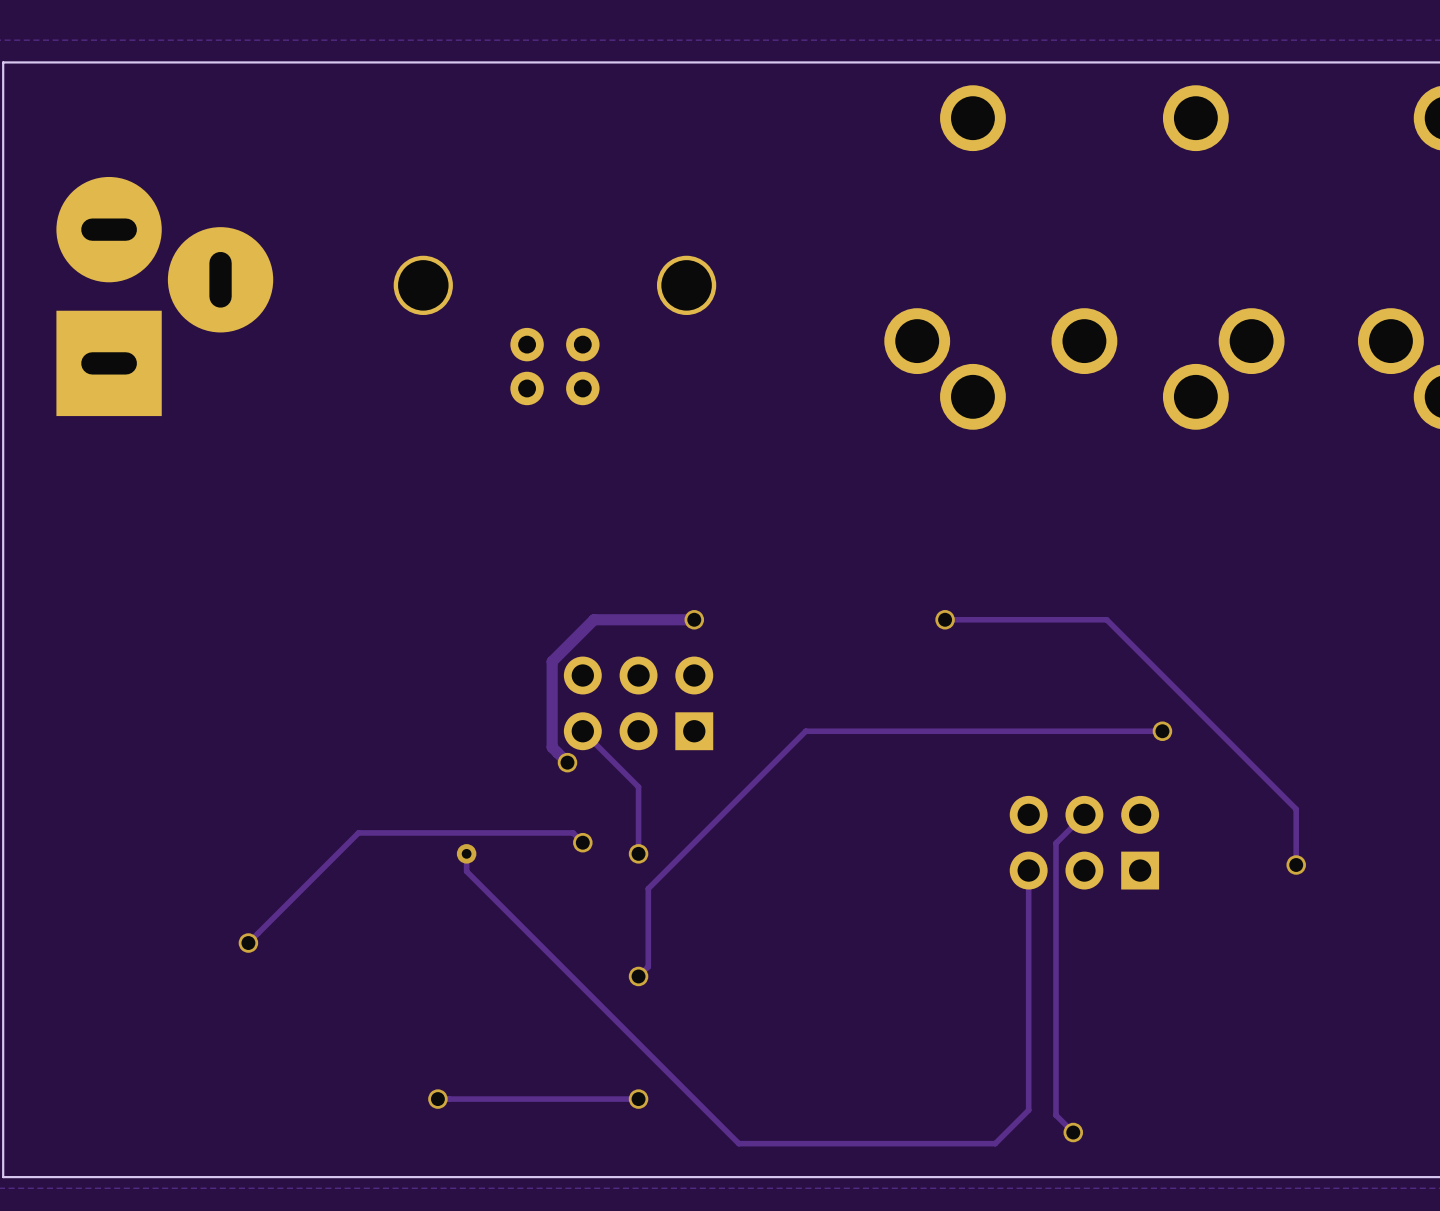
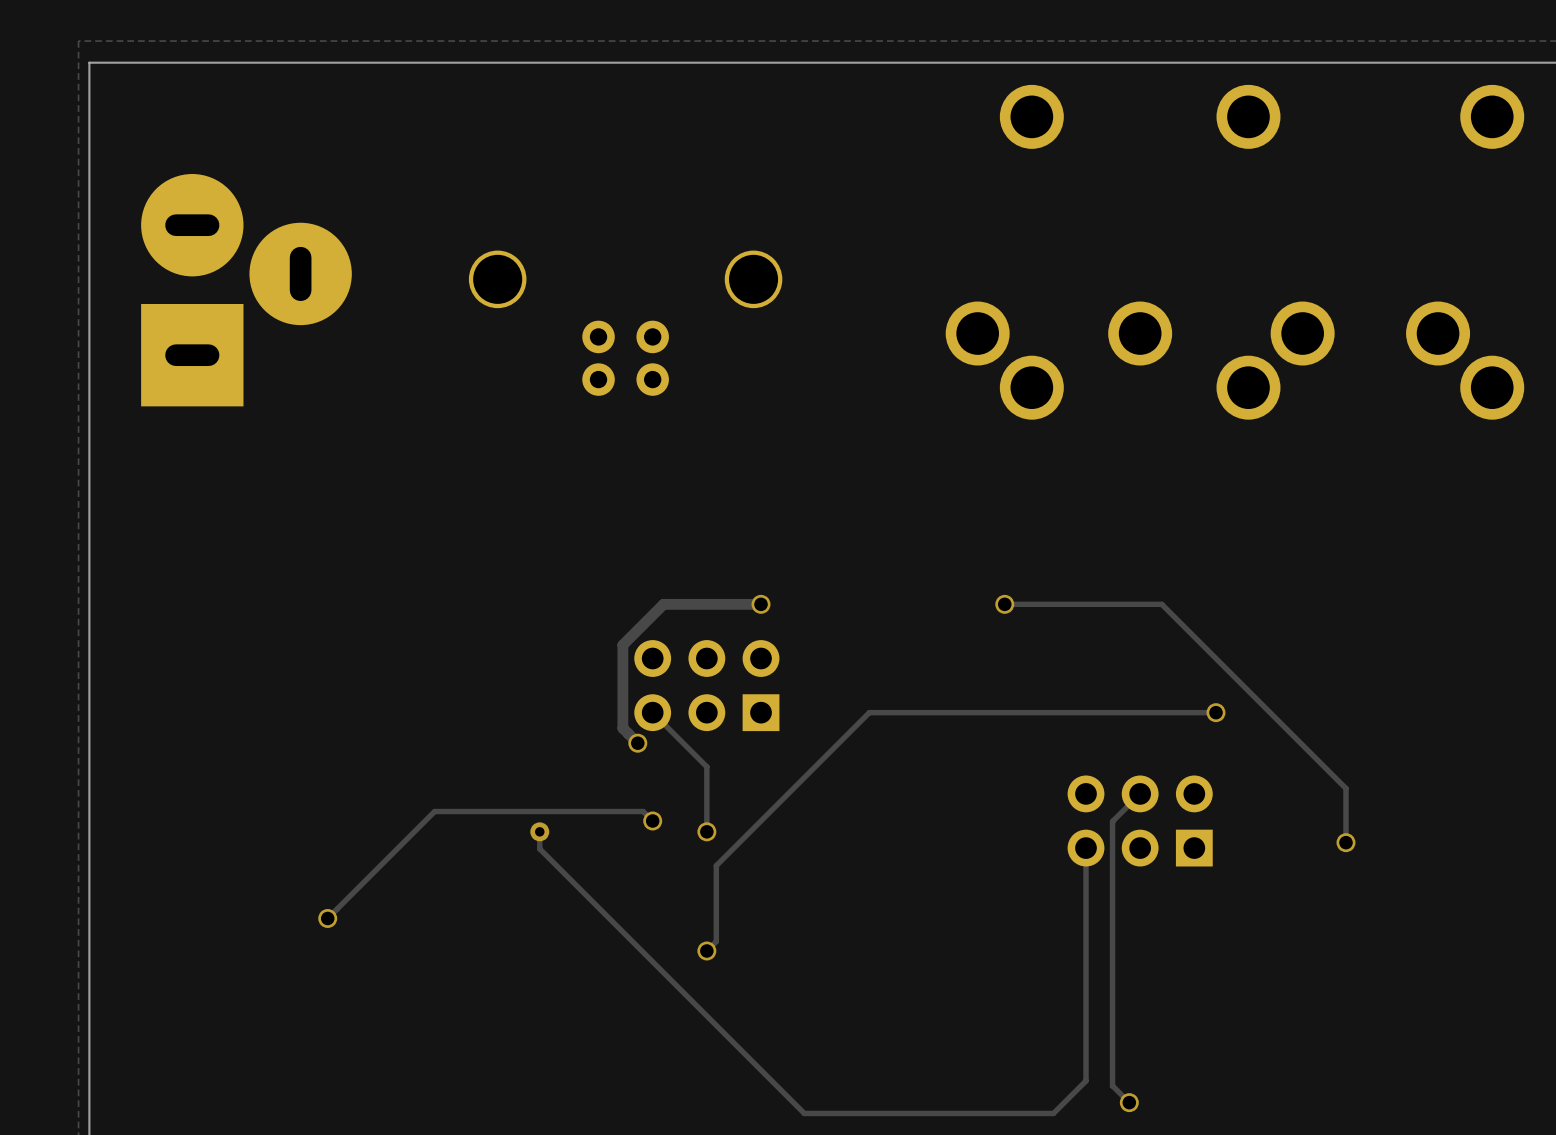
via: (437, 1099) -> none
track: (638, 1099) (437, 1099) -> none
via: (638, 1099) -> none

